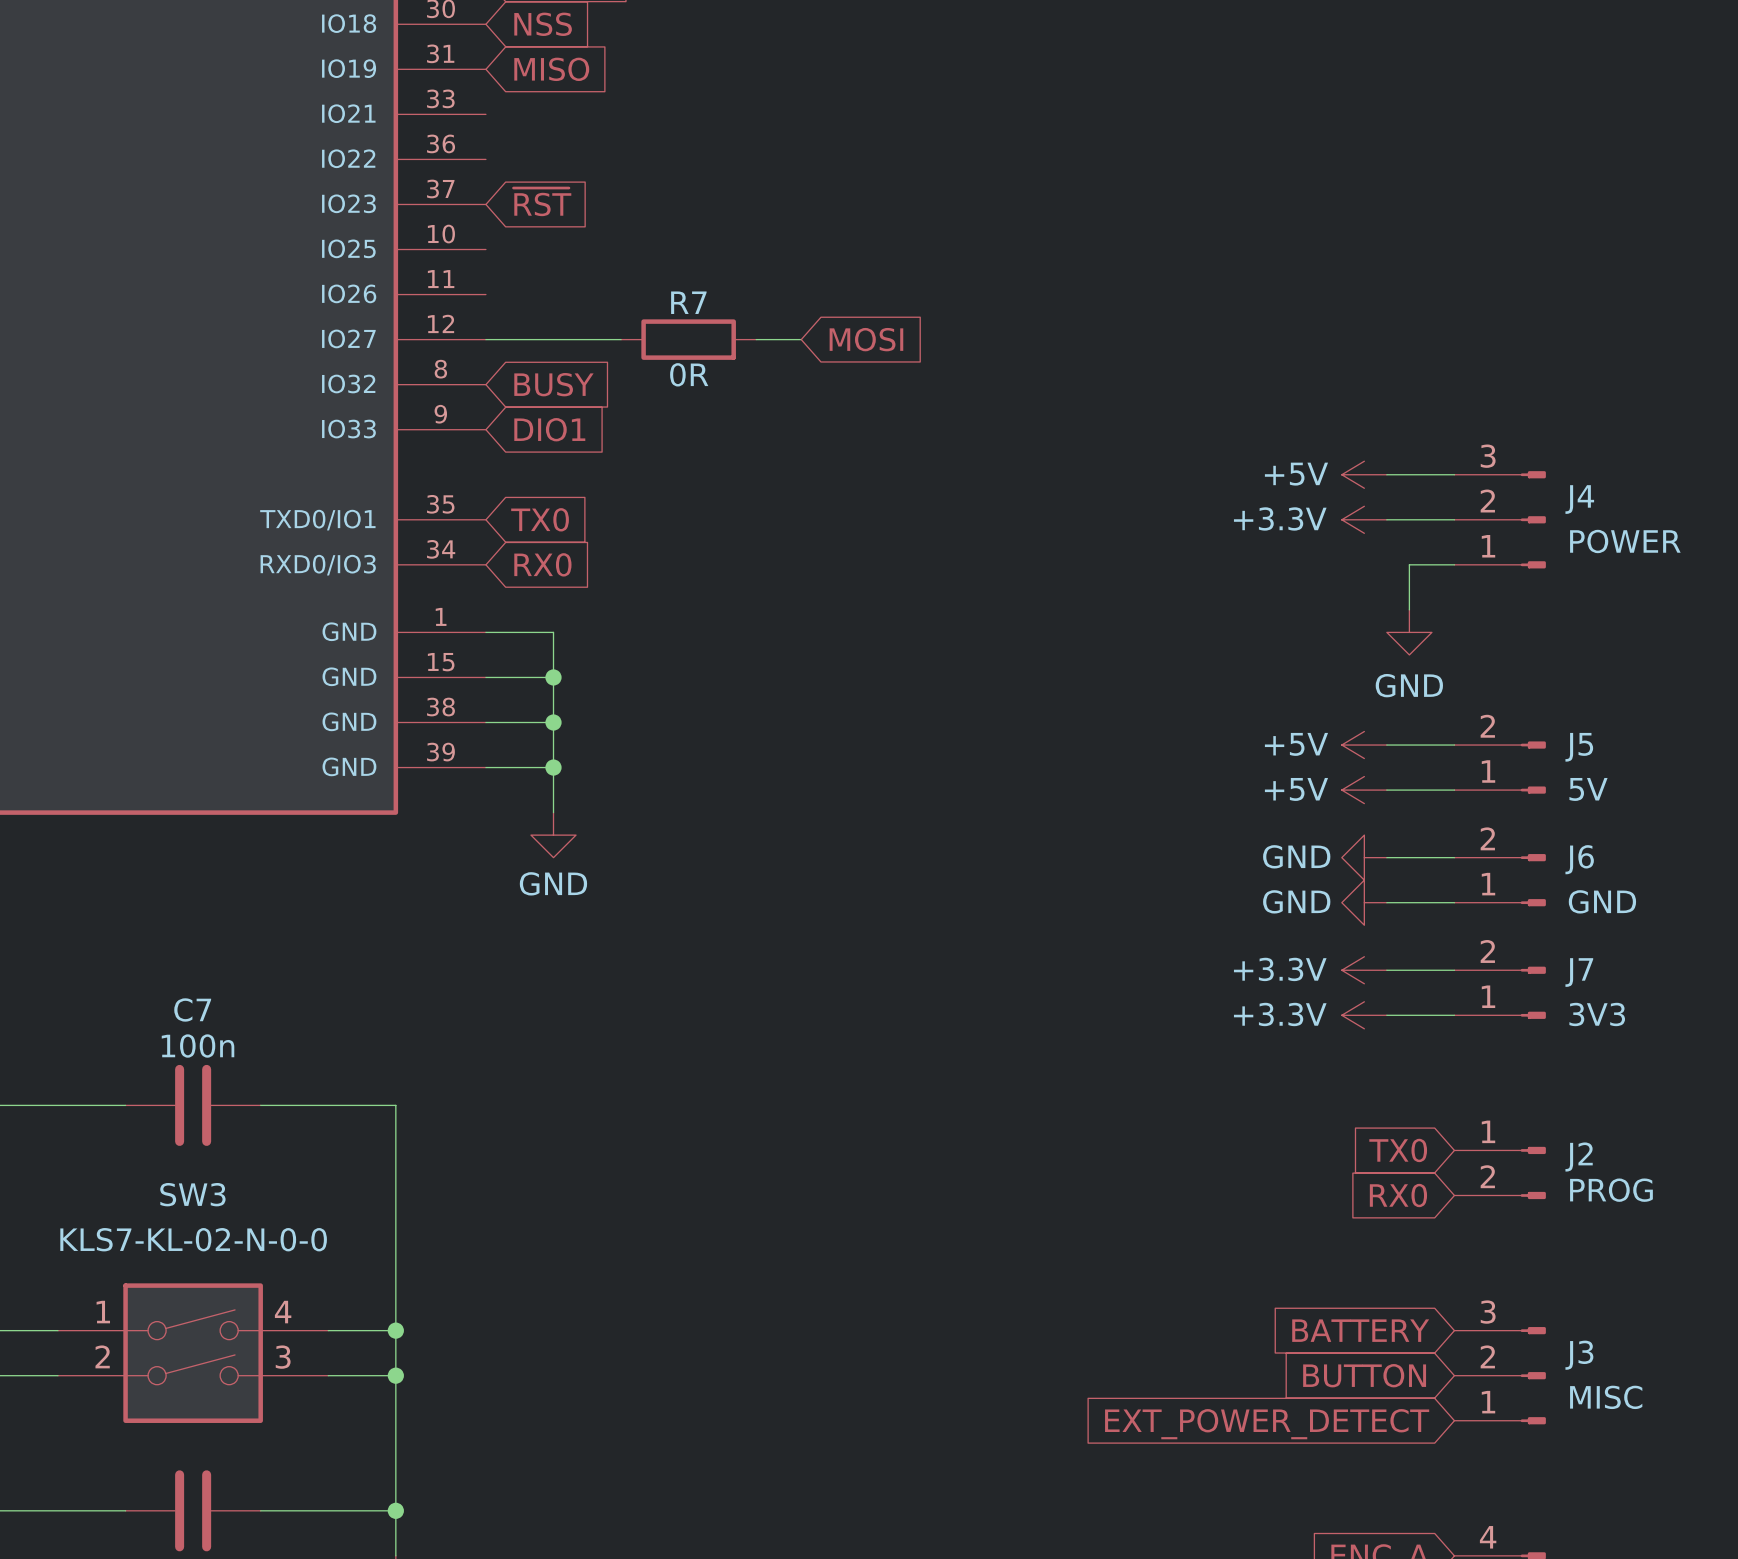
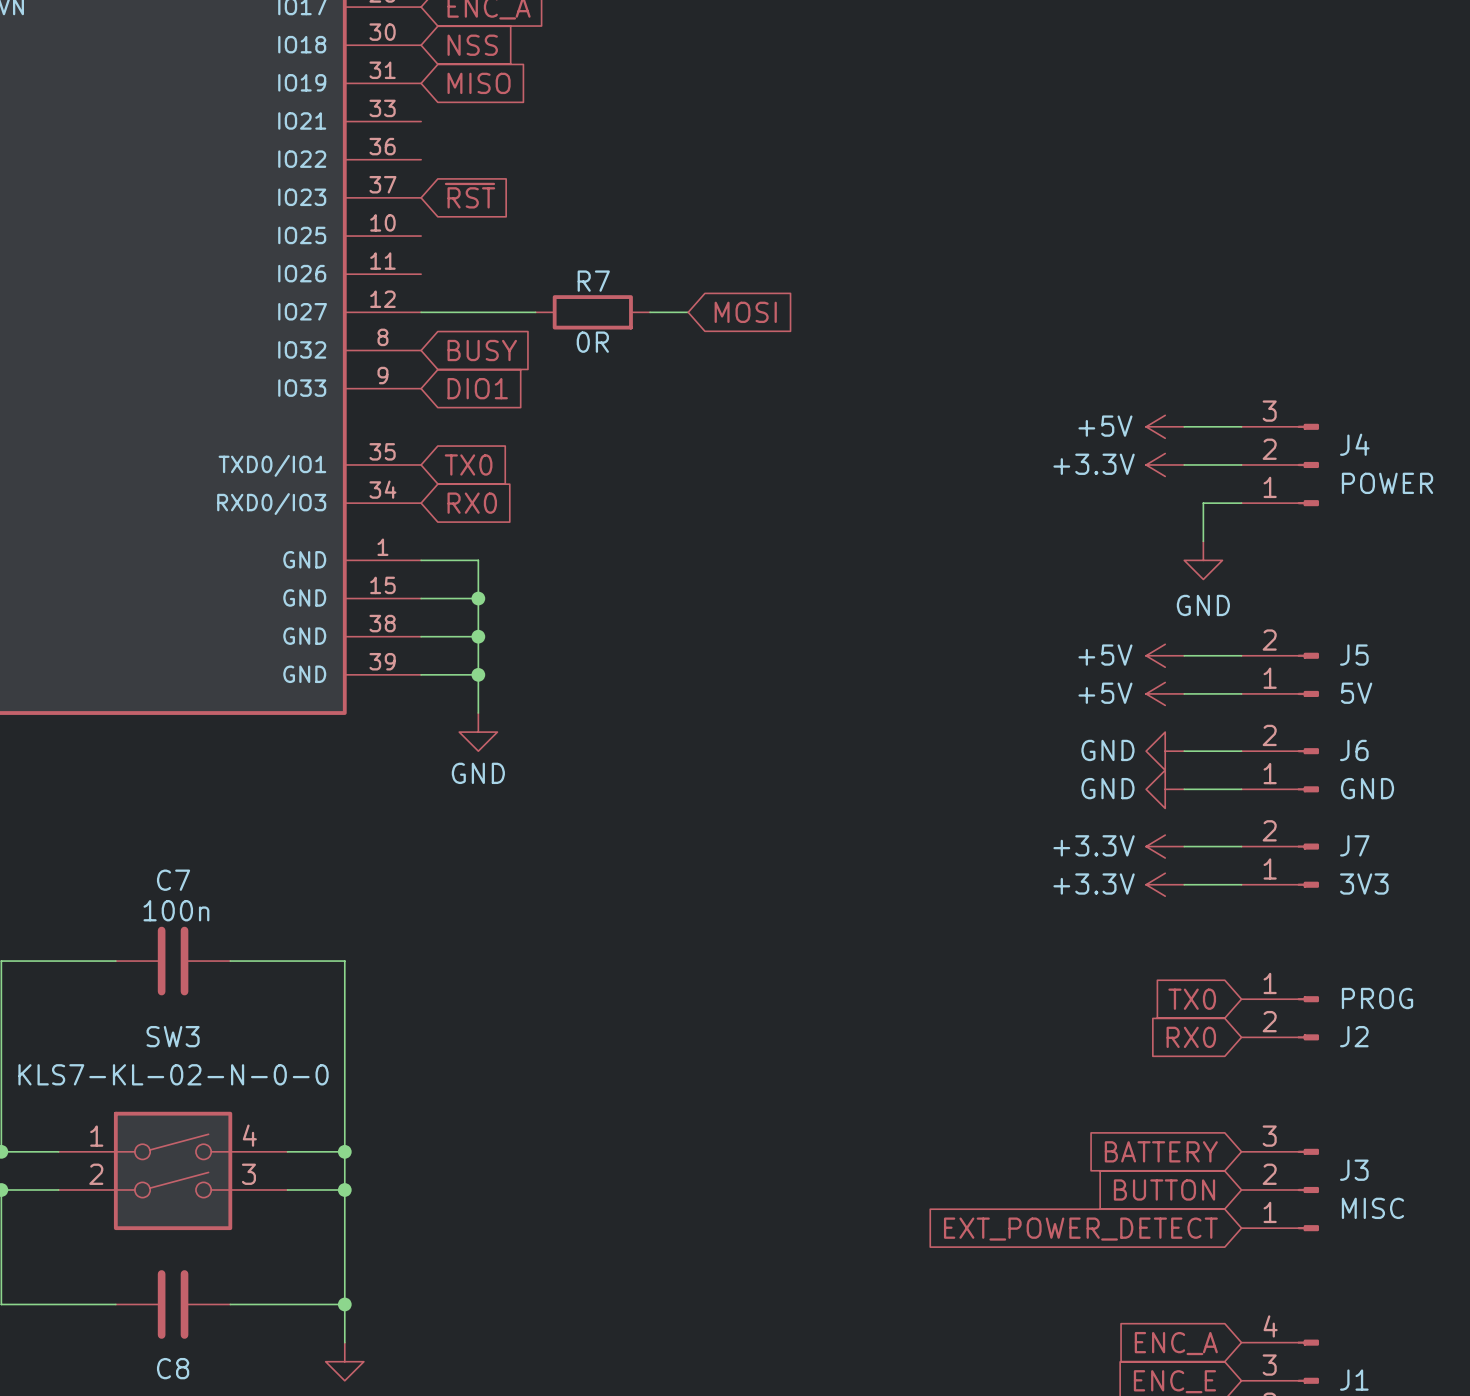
J2 name position: J2 (1579, 1157) -> J2 (1354, 1036)
J2 value position: PROG (1611, 1190) -> PROG (1377, 998)

